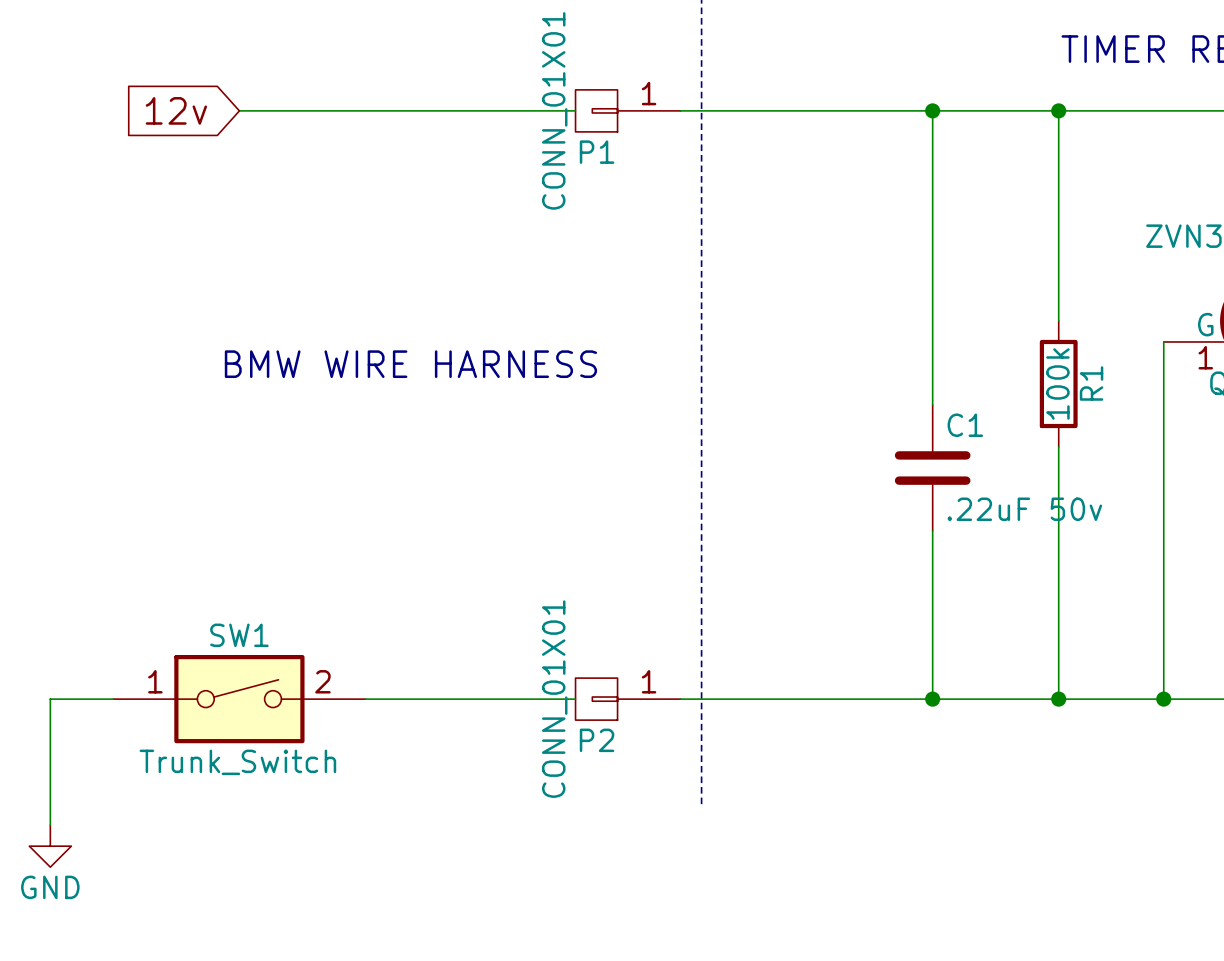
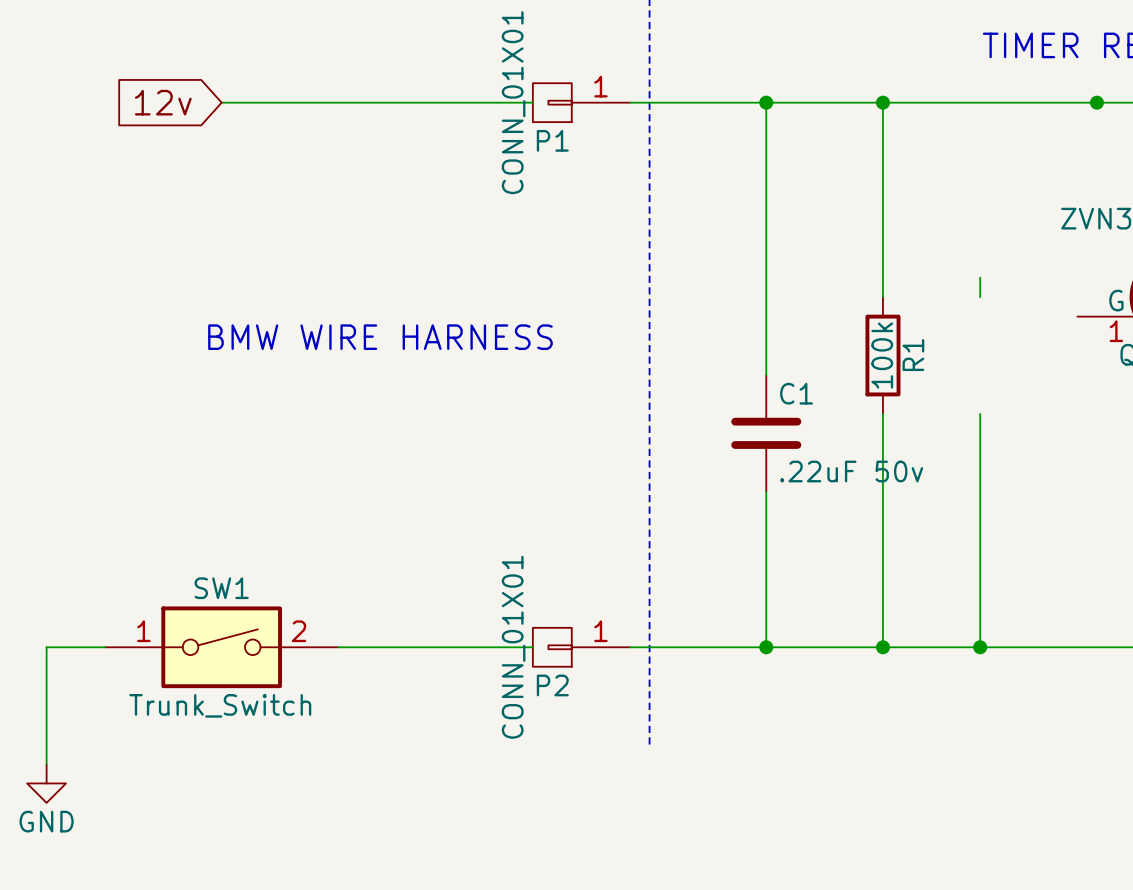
junction: none -> (766, 102)
wire: (932, 110) (932, 405) -> (766, 102) (766, 374)
junction position: (932, 110) -> (882, 102)
wire: none -> (882, 102) (882, 297)
wire: (1058, 110) (1058, 299) -> none
junction: (1058, 110) -> none
junction: none -> (1096, 102)
wire: (1163, 341) (1163, 699) -> none
R1 position: (1058, 383) -> (882, 355)
wire: none -> (882, 413) (882, 647)
C1 position: (932, 468) -> (766, 433)
wire: (932, 531) (932, 699) -> (766, 491) (766, 647)
junction: none -> (766, 647)
junction position: (932, 699) -> (882, 647)
junction: (1163, 699) -> none

